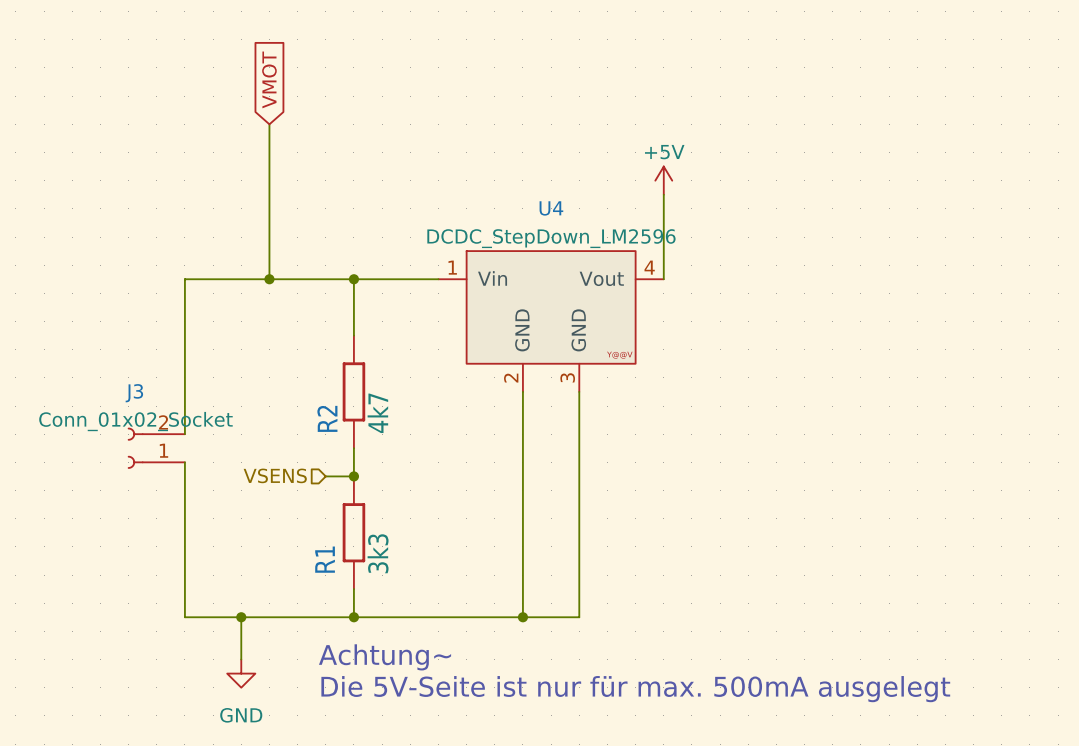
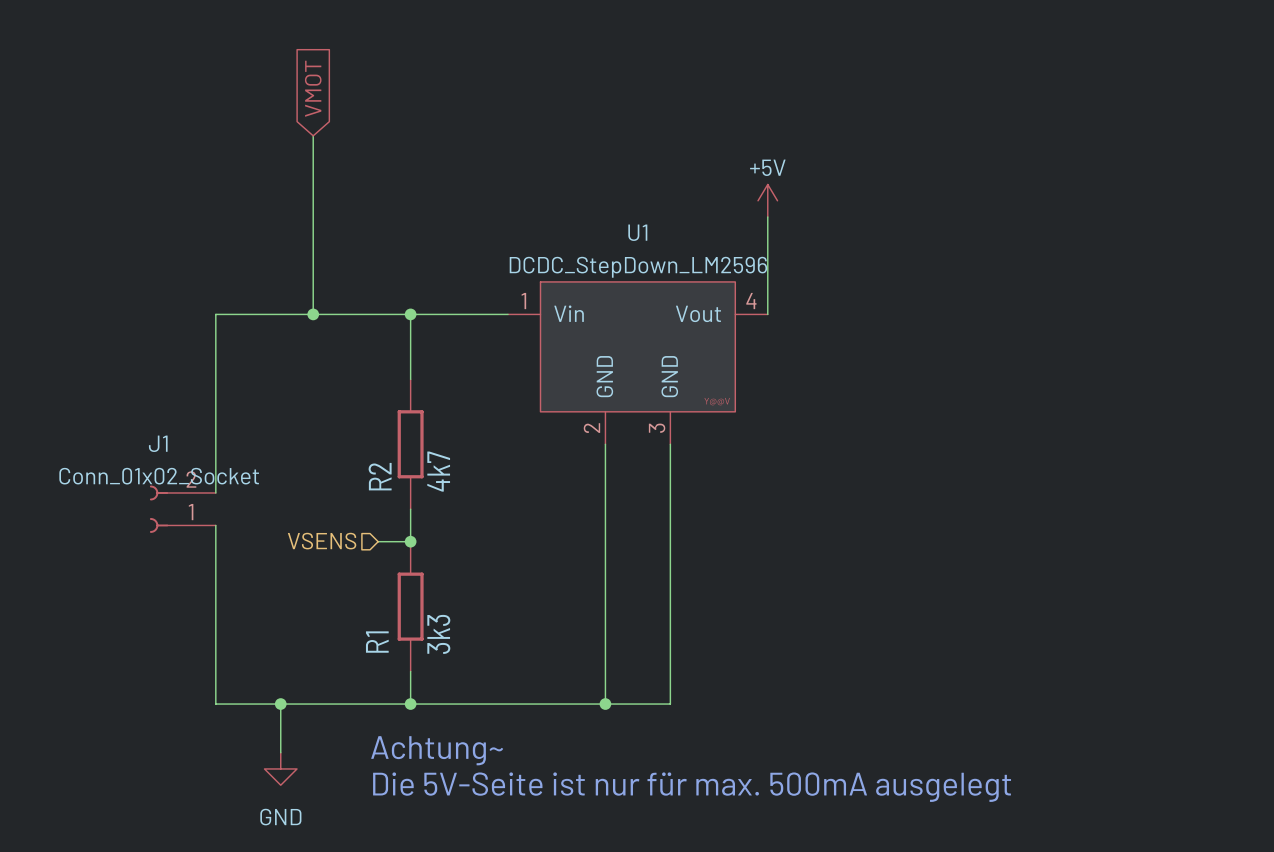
U4 name: U4 (551, 208) -> U1 (637, 232)
J3 name: J3 (134, 393) -> J1 (158, 443)

